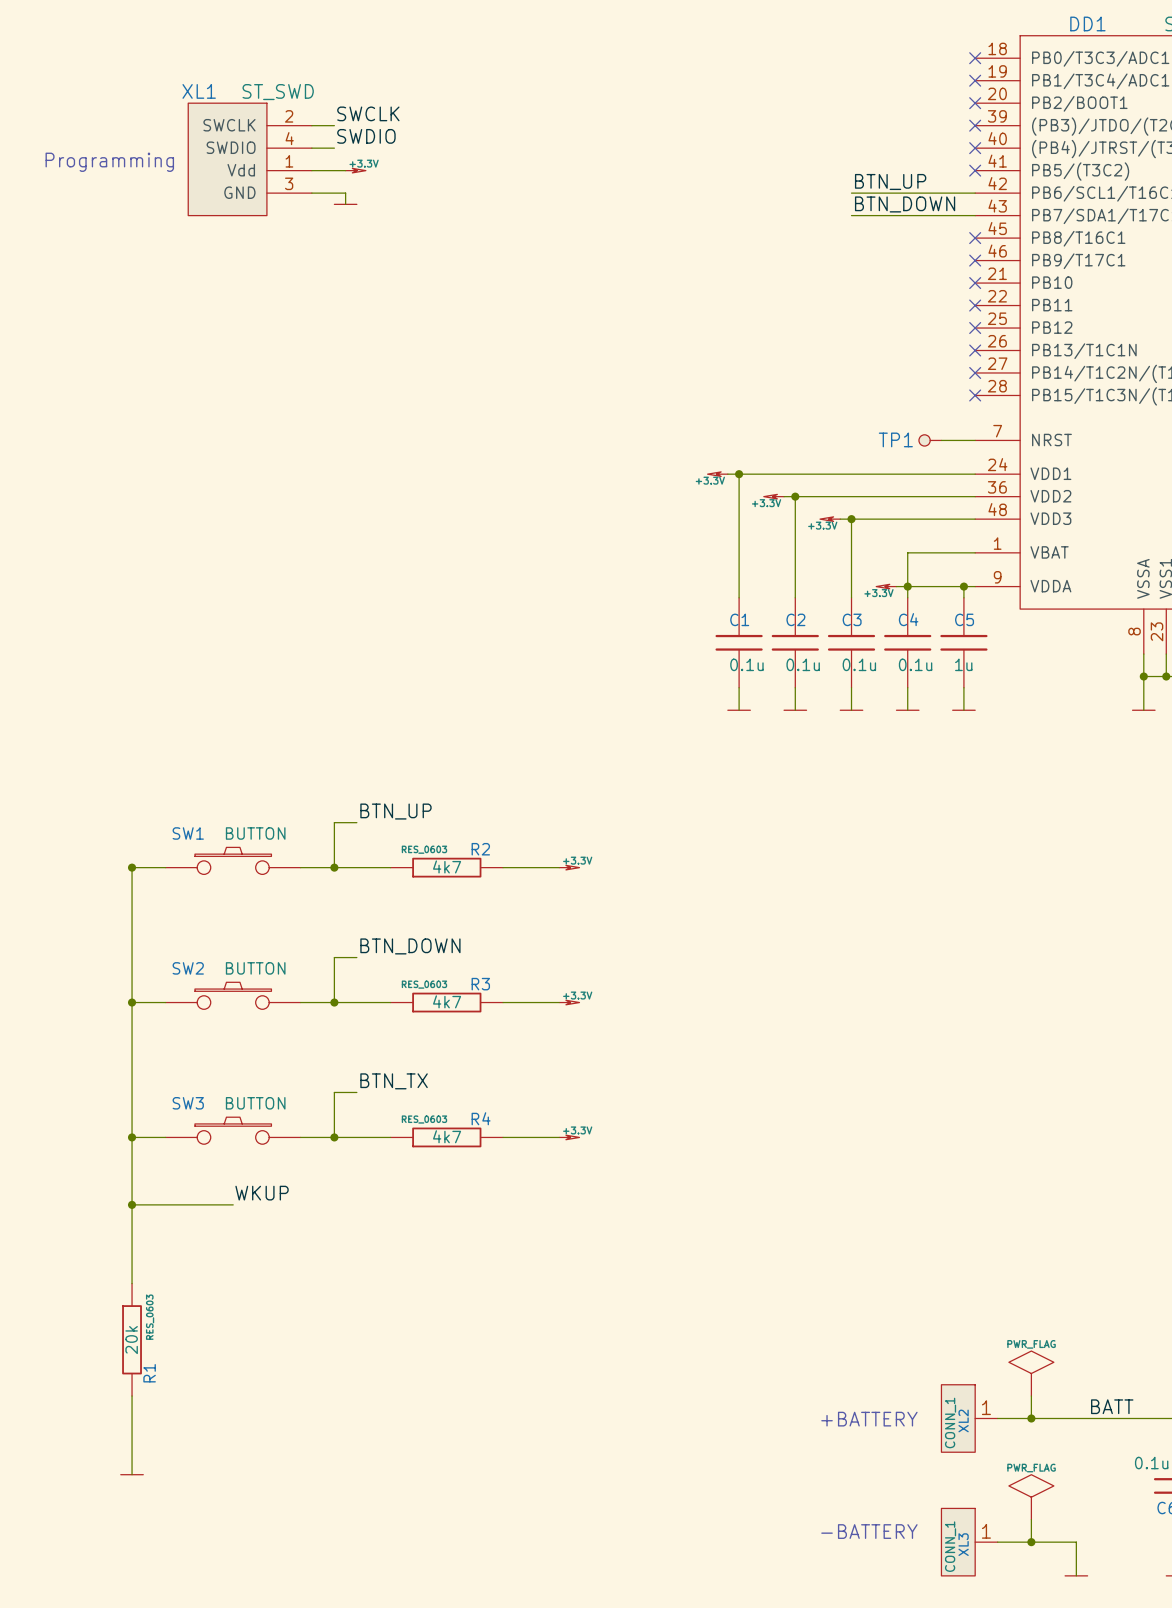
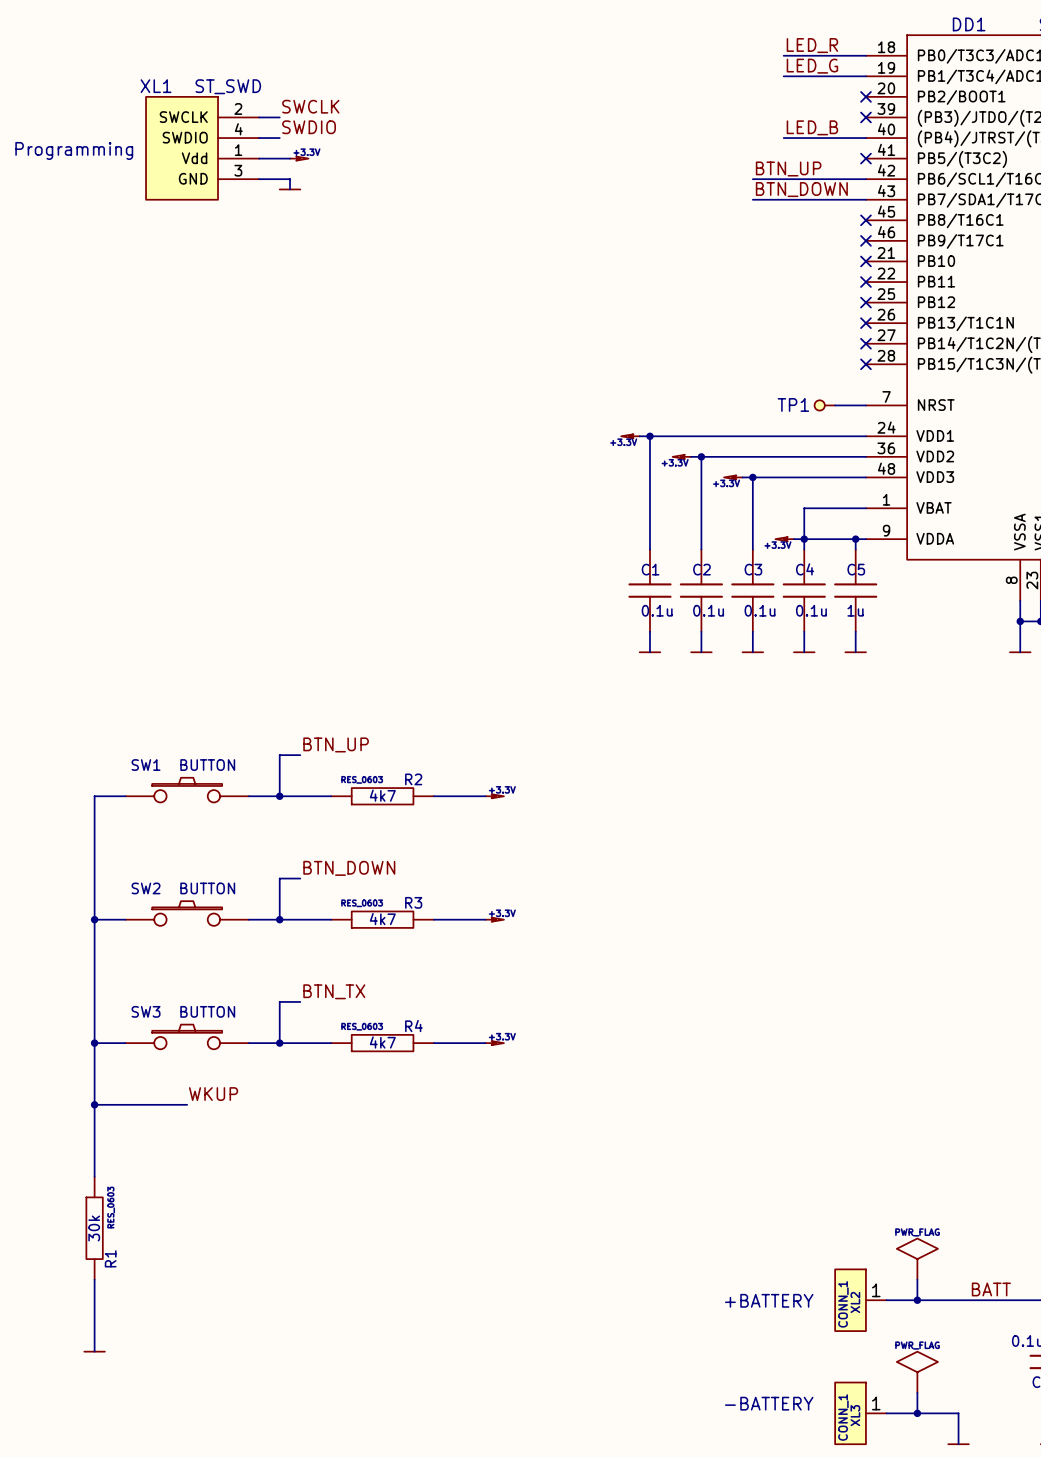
label: none -> LED_R (812, 45)
wire: none -> (783, 55) (865, 55)
no-connect mark: (975, 58) -> none
label: none -> LED_G (812, 66)
wire: none -> (783, 76) (865, 76)
no-connect mark: (975, 80) -> none
label: none -> LED_B (812, 127)
wire: none -> (783, 138) (865, 138)
no-connect mark: (975, 148) -> none
junction: (132, 867) -> none
R1 value: 20k (131, 1340) -> 30k (94, 1228)

